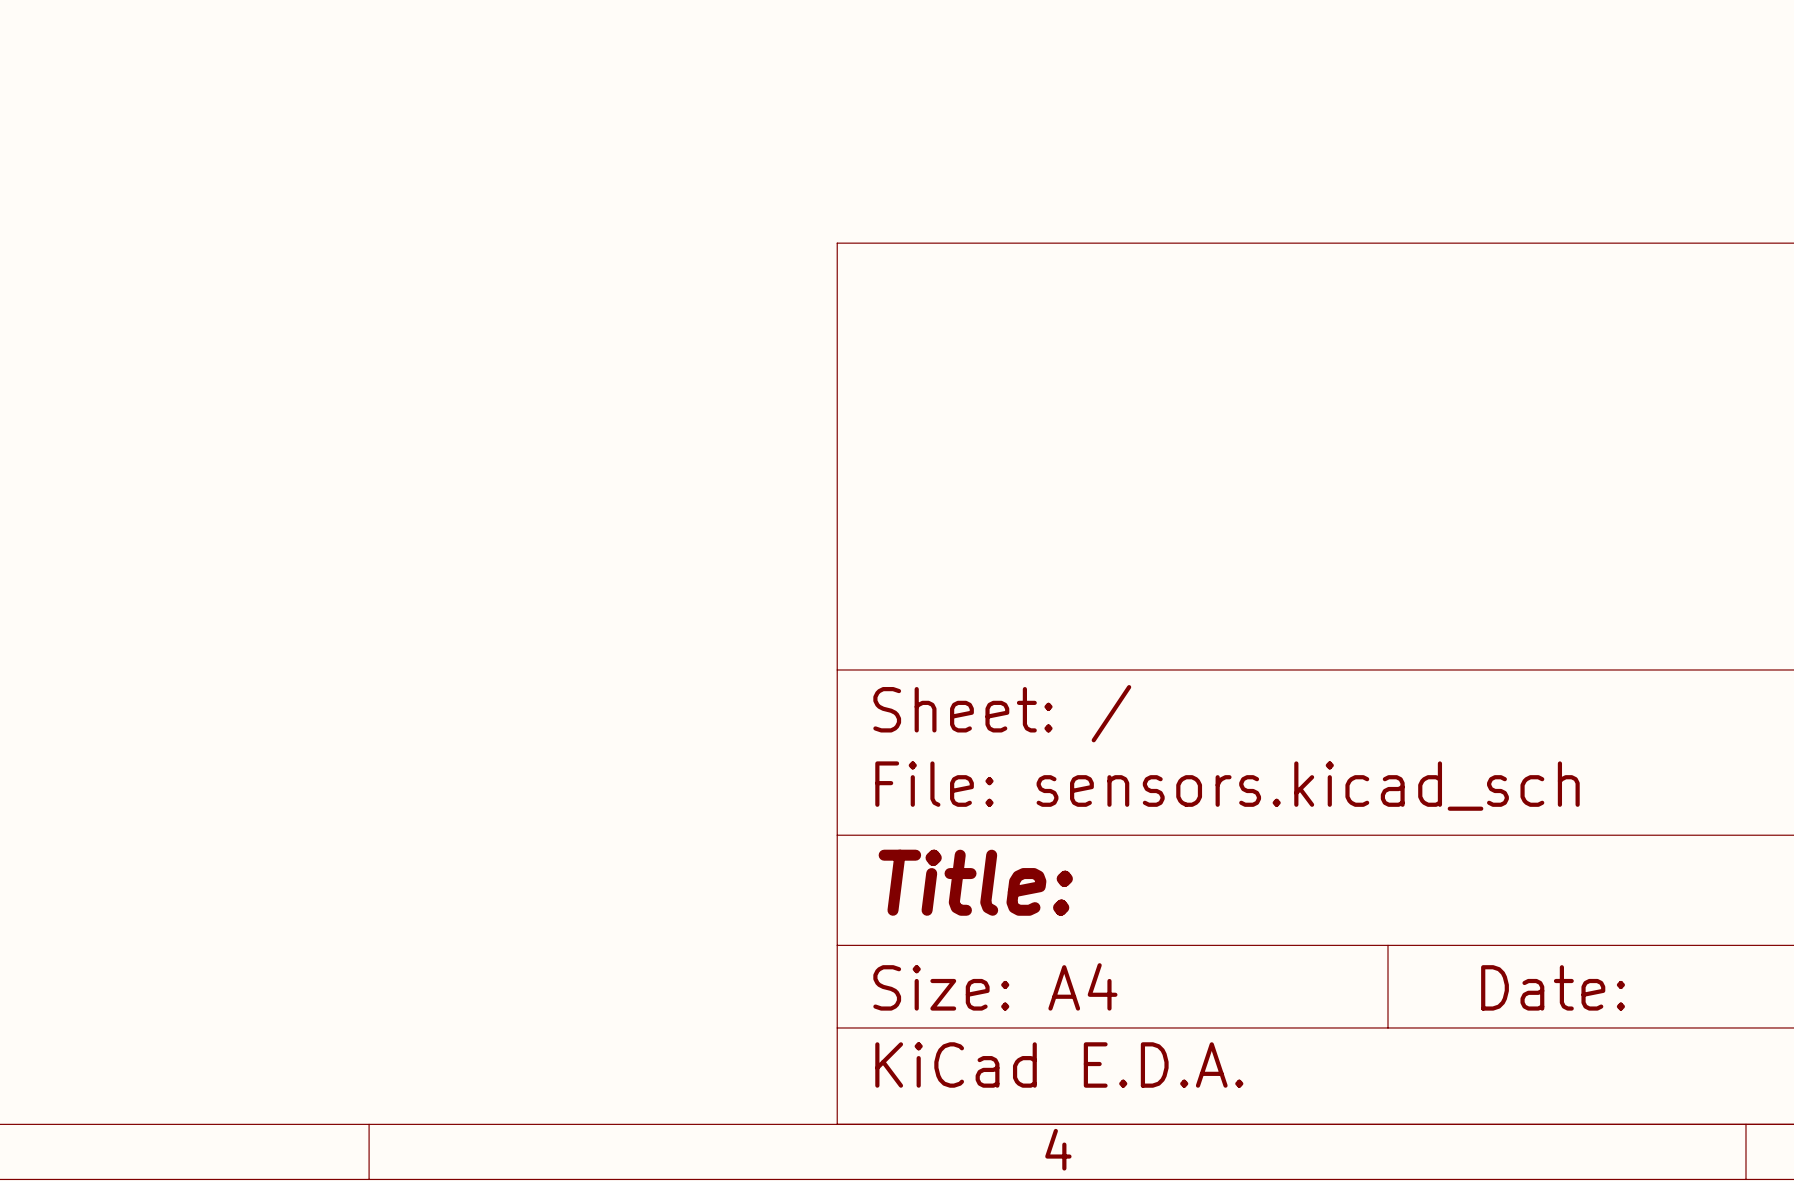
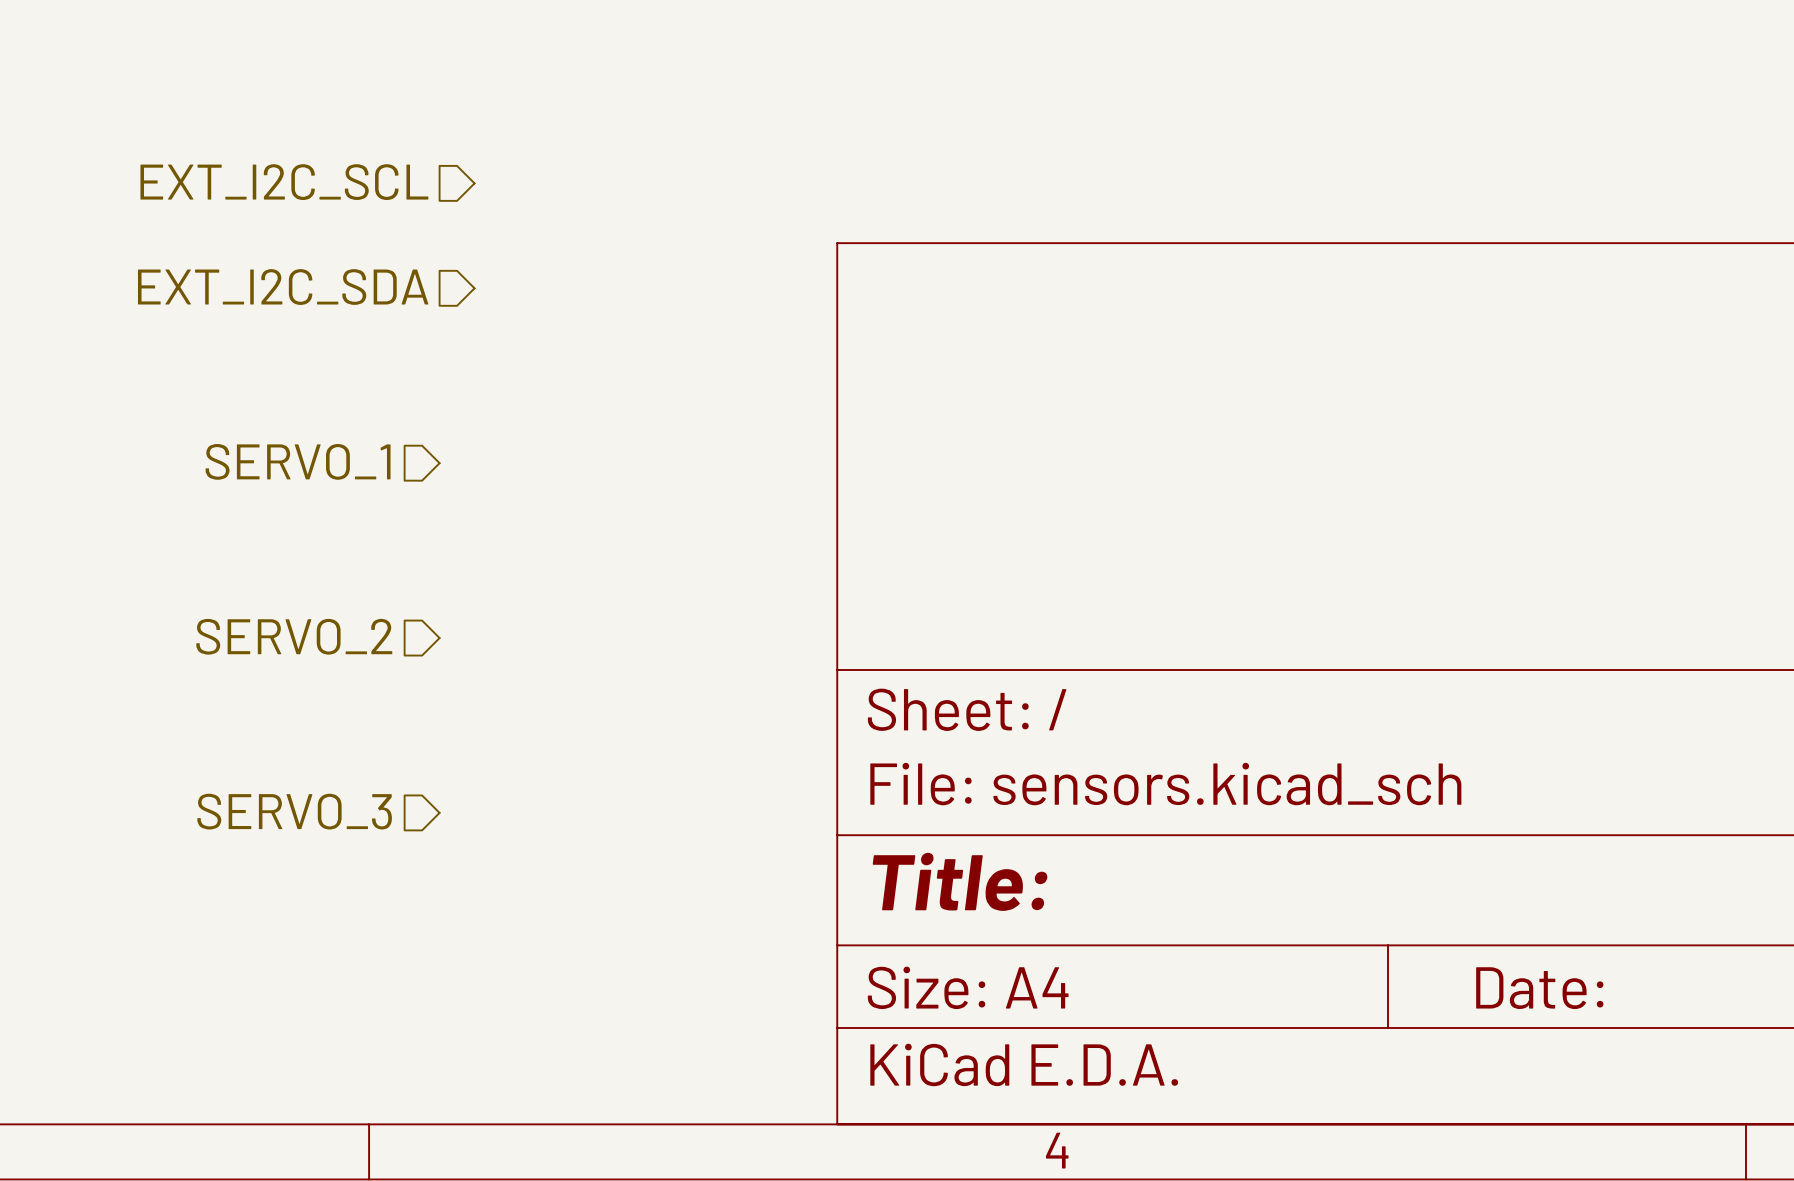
hierarchical label: none -> EXT_I2C_SCL (284, 182)
hierarchical label: none -> EXT_I2C_SDA (283, 287)
hierarchical label: none -> SERVO_1 (298, 461)
hierarchical label: none -> SERVO_2 (294, 636)
hierarchical label: none -> SERVO_3 (294, 811)

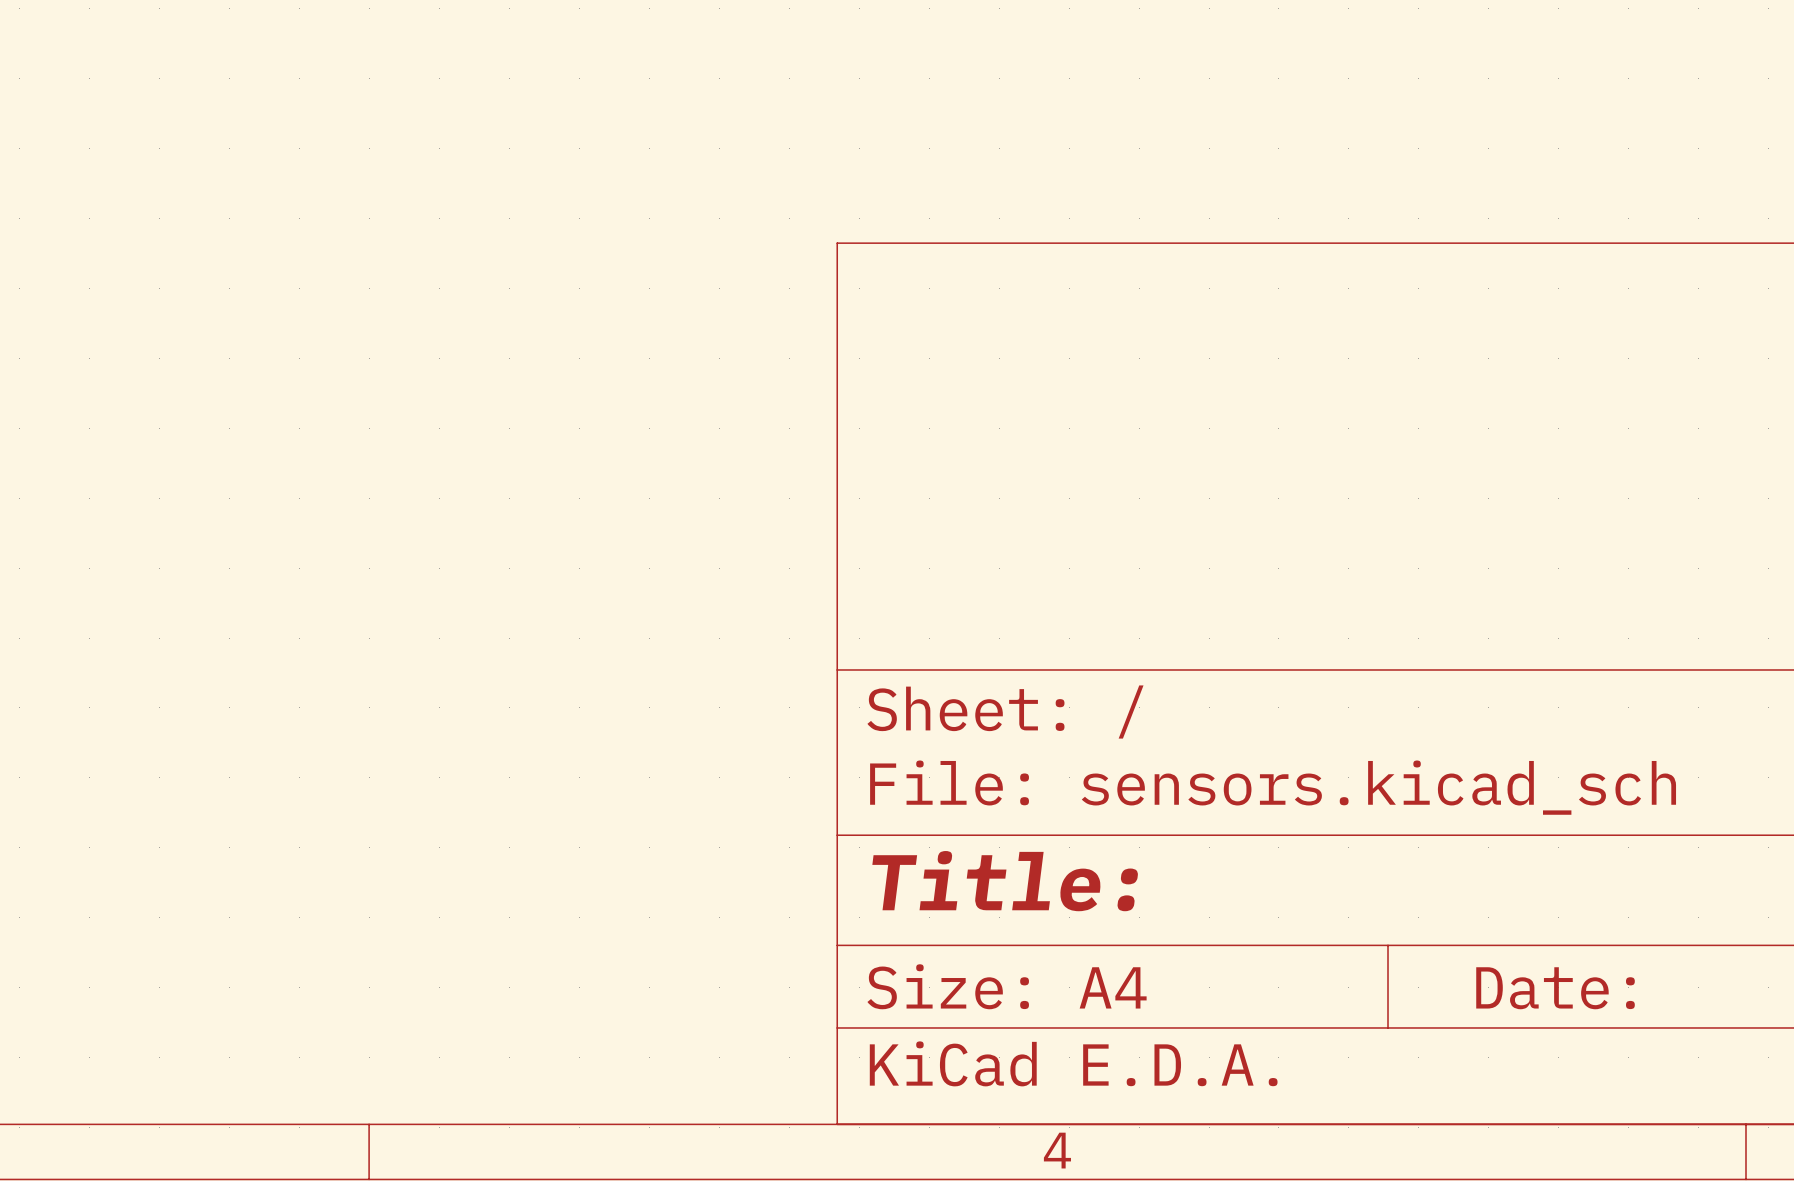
hierarchical label: EXT_I2C_SCL (284, 182) -> none
hierarchical label: EXT_I2C_SDA (283, 287) -> none
hierarchical label: SERVO_1 (298, 461) -> none
hierarchical label: SERVO_2 (294, 636) -> none
hierarchical label: SERVO_3 (294, 811) -> none

